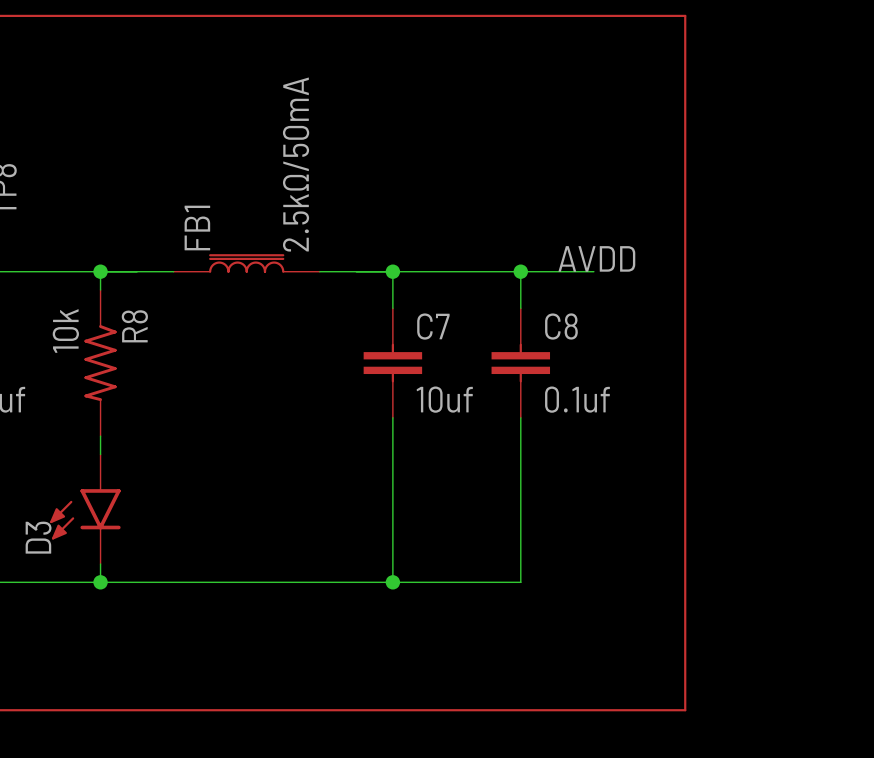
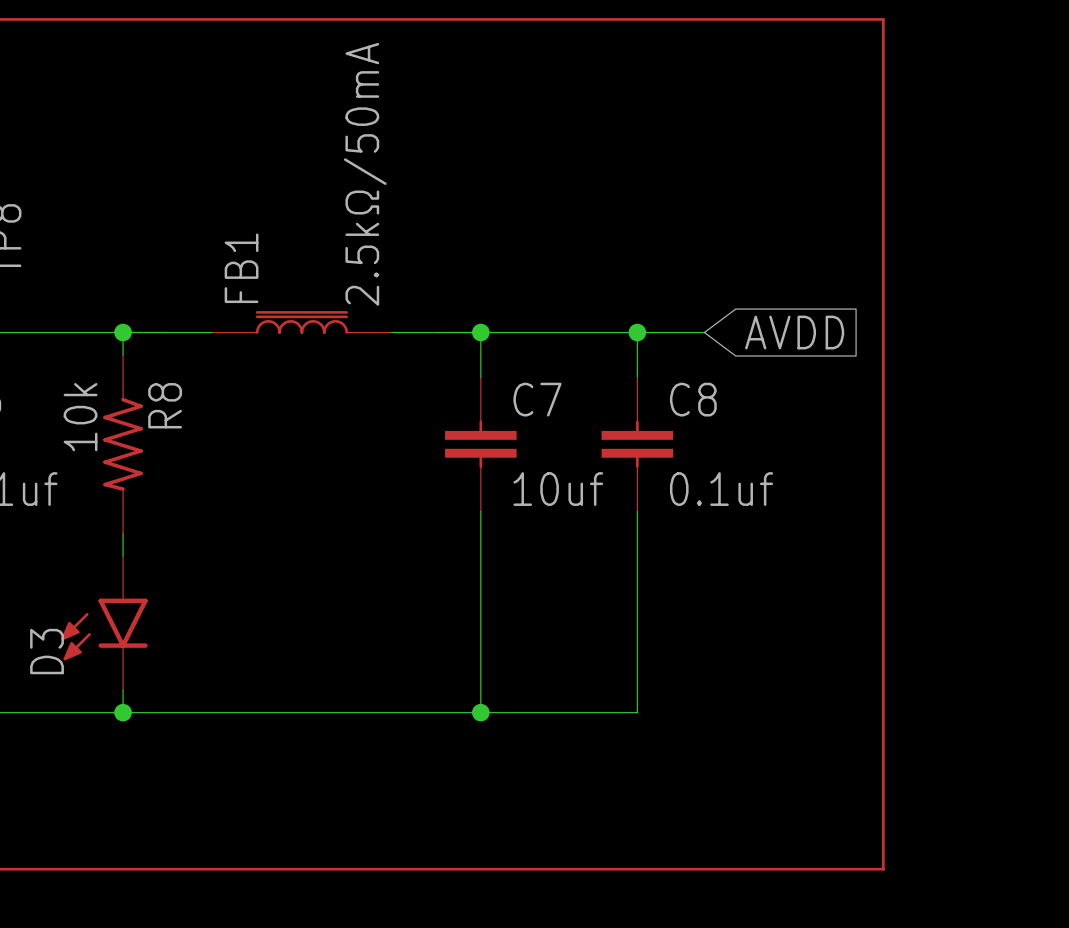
line: (685, 15) (685, 710) -> (838, 19) (883, 19) (883, 869) (838, 869)
label: AVDD (596, 258) -> none
wire: (575, 271) (593, 271) -> none
global label: none -> AVDD (794, 332)

